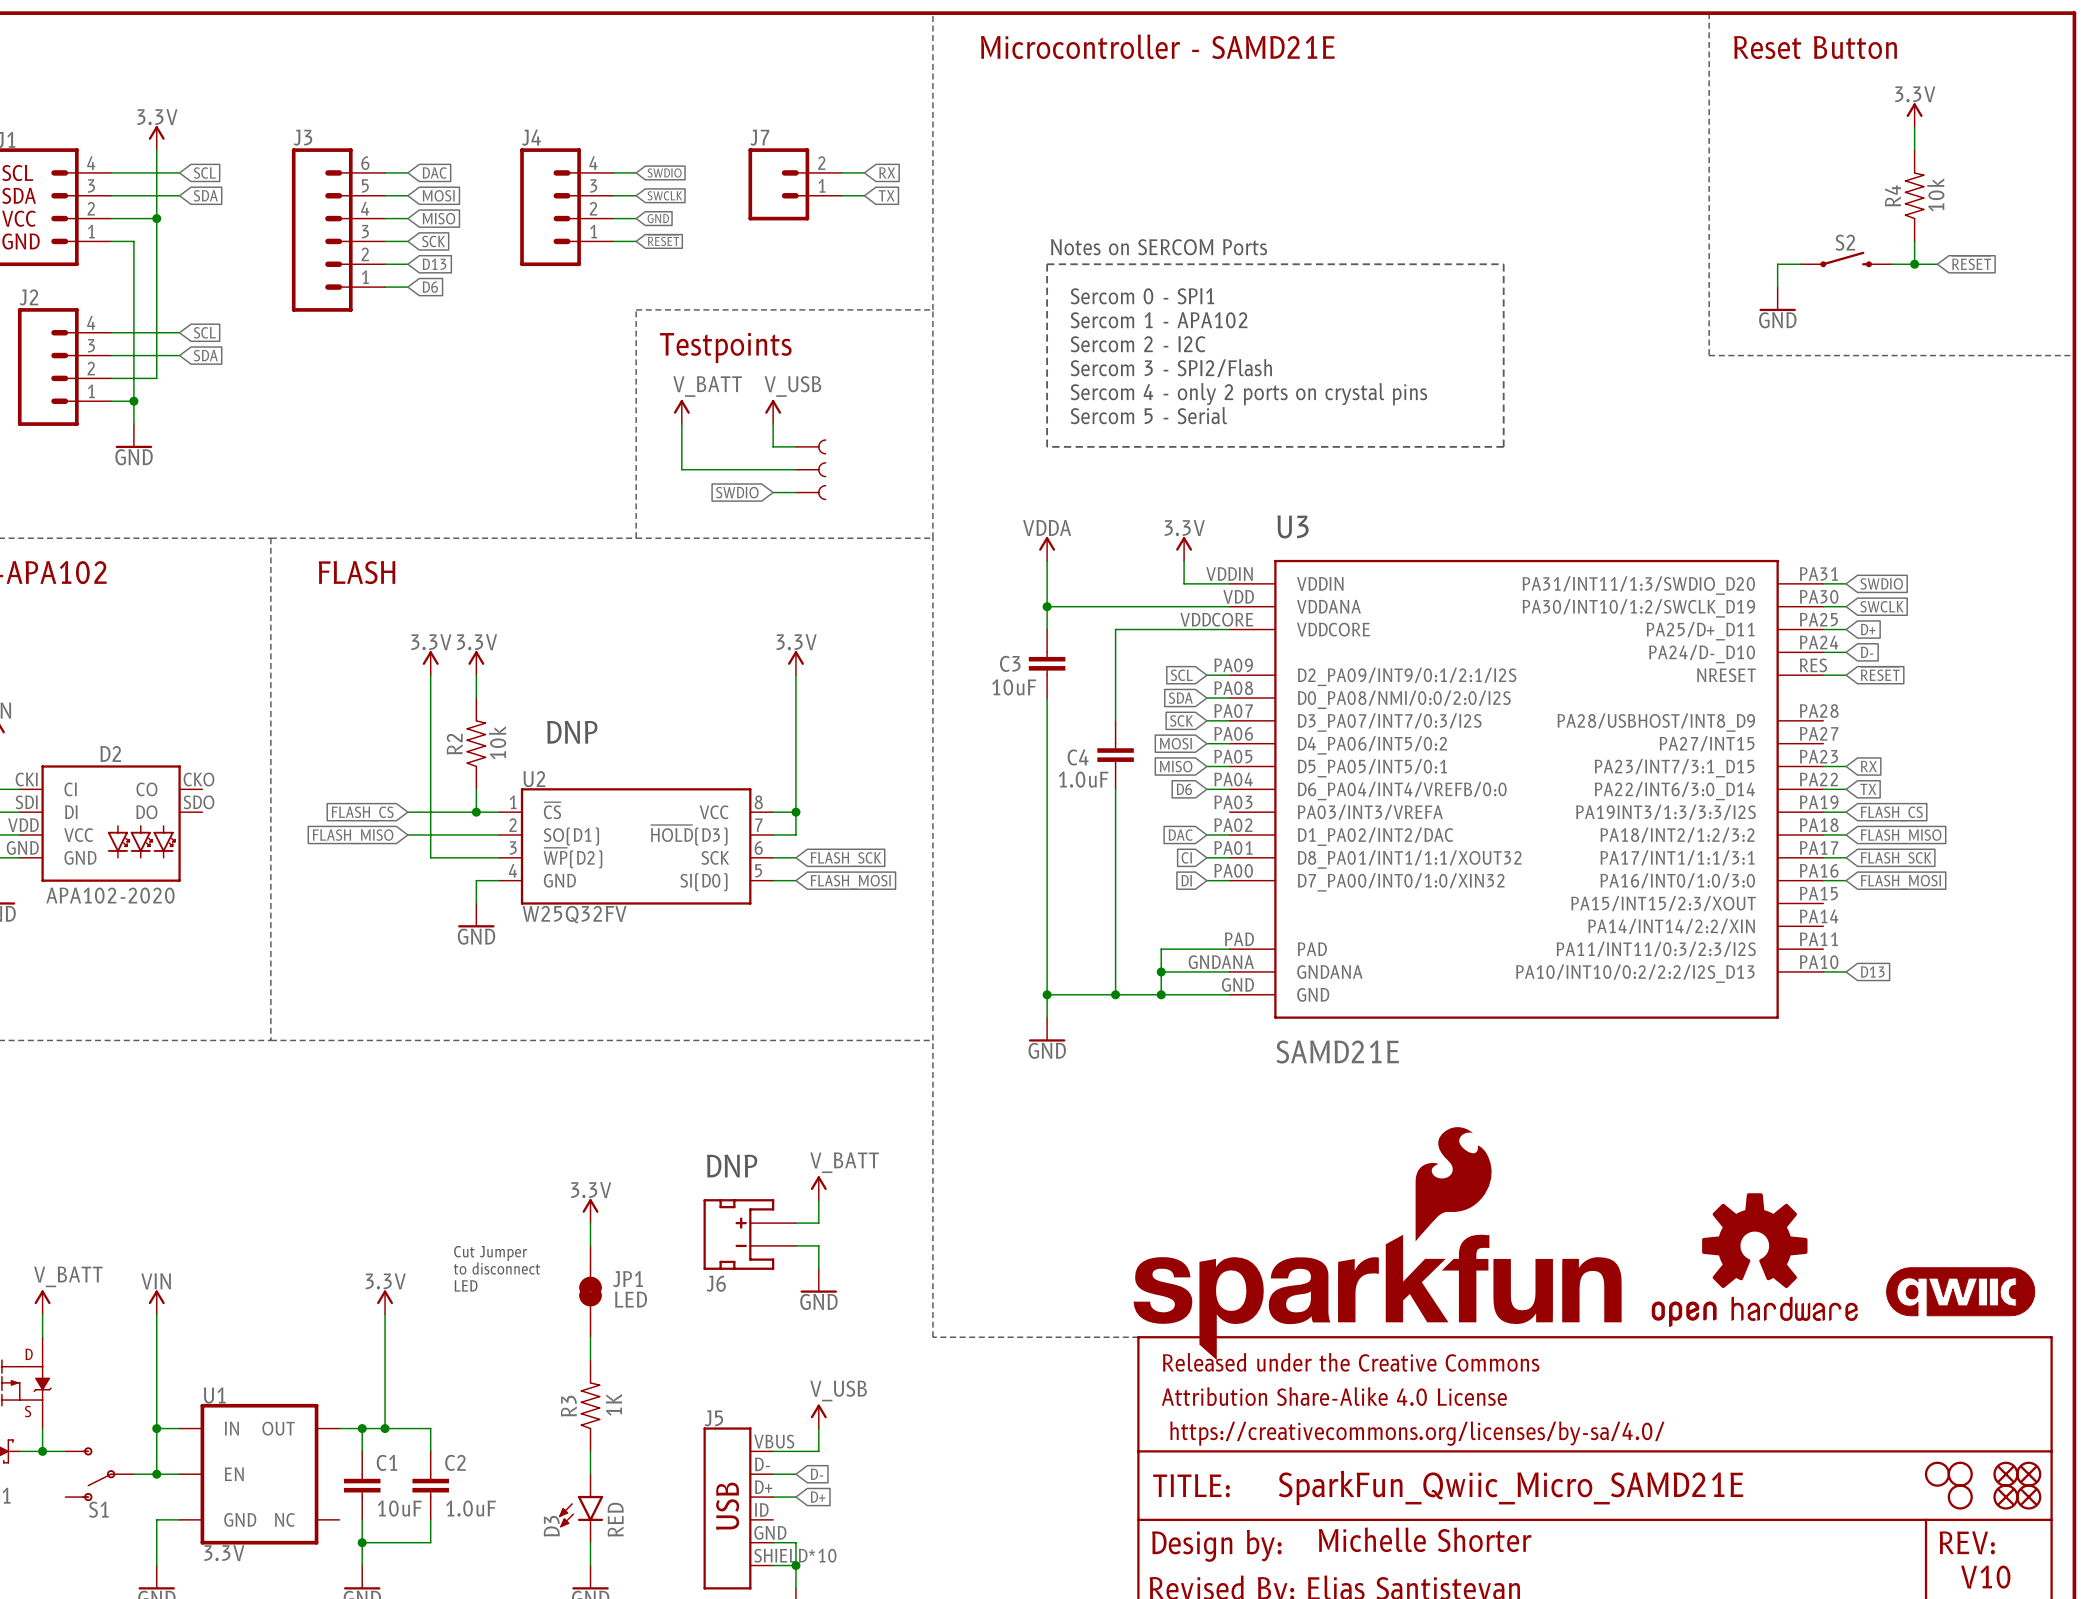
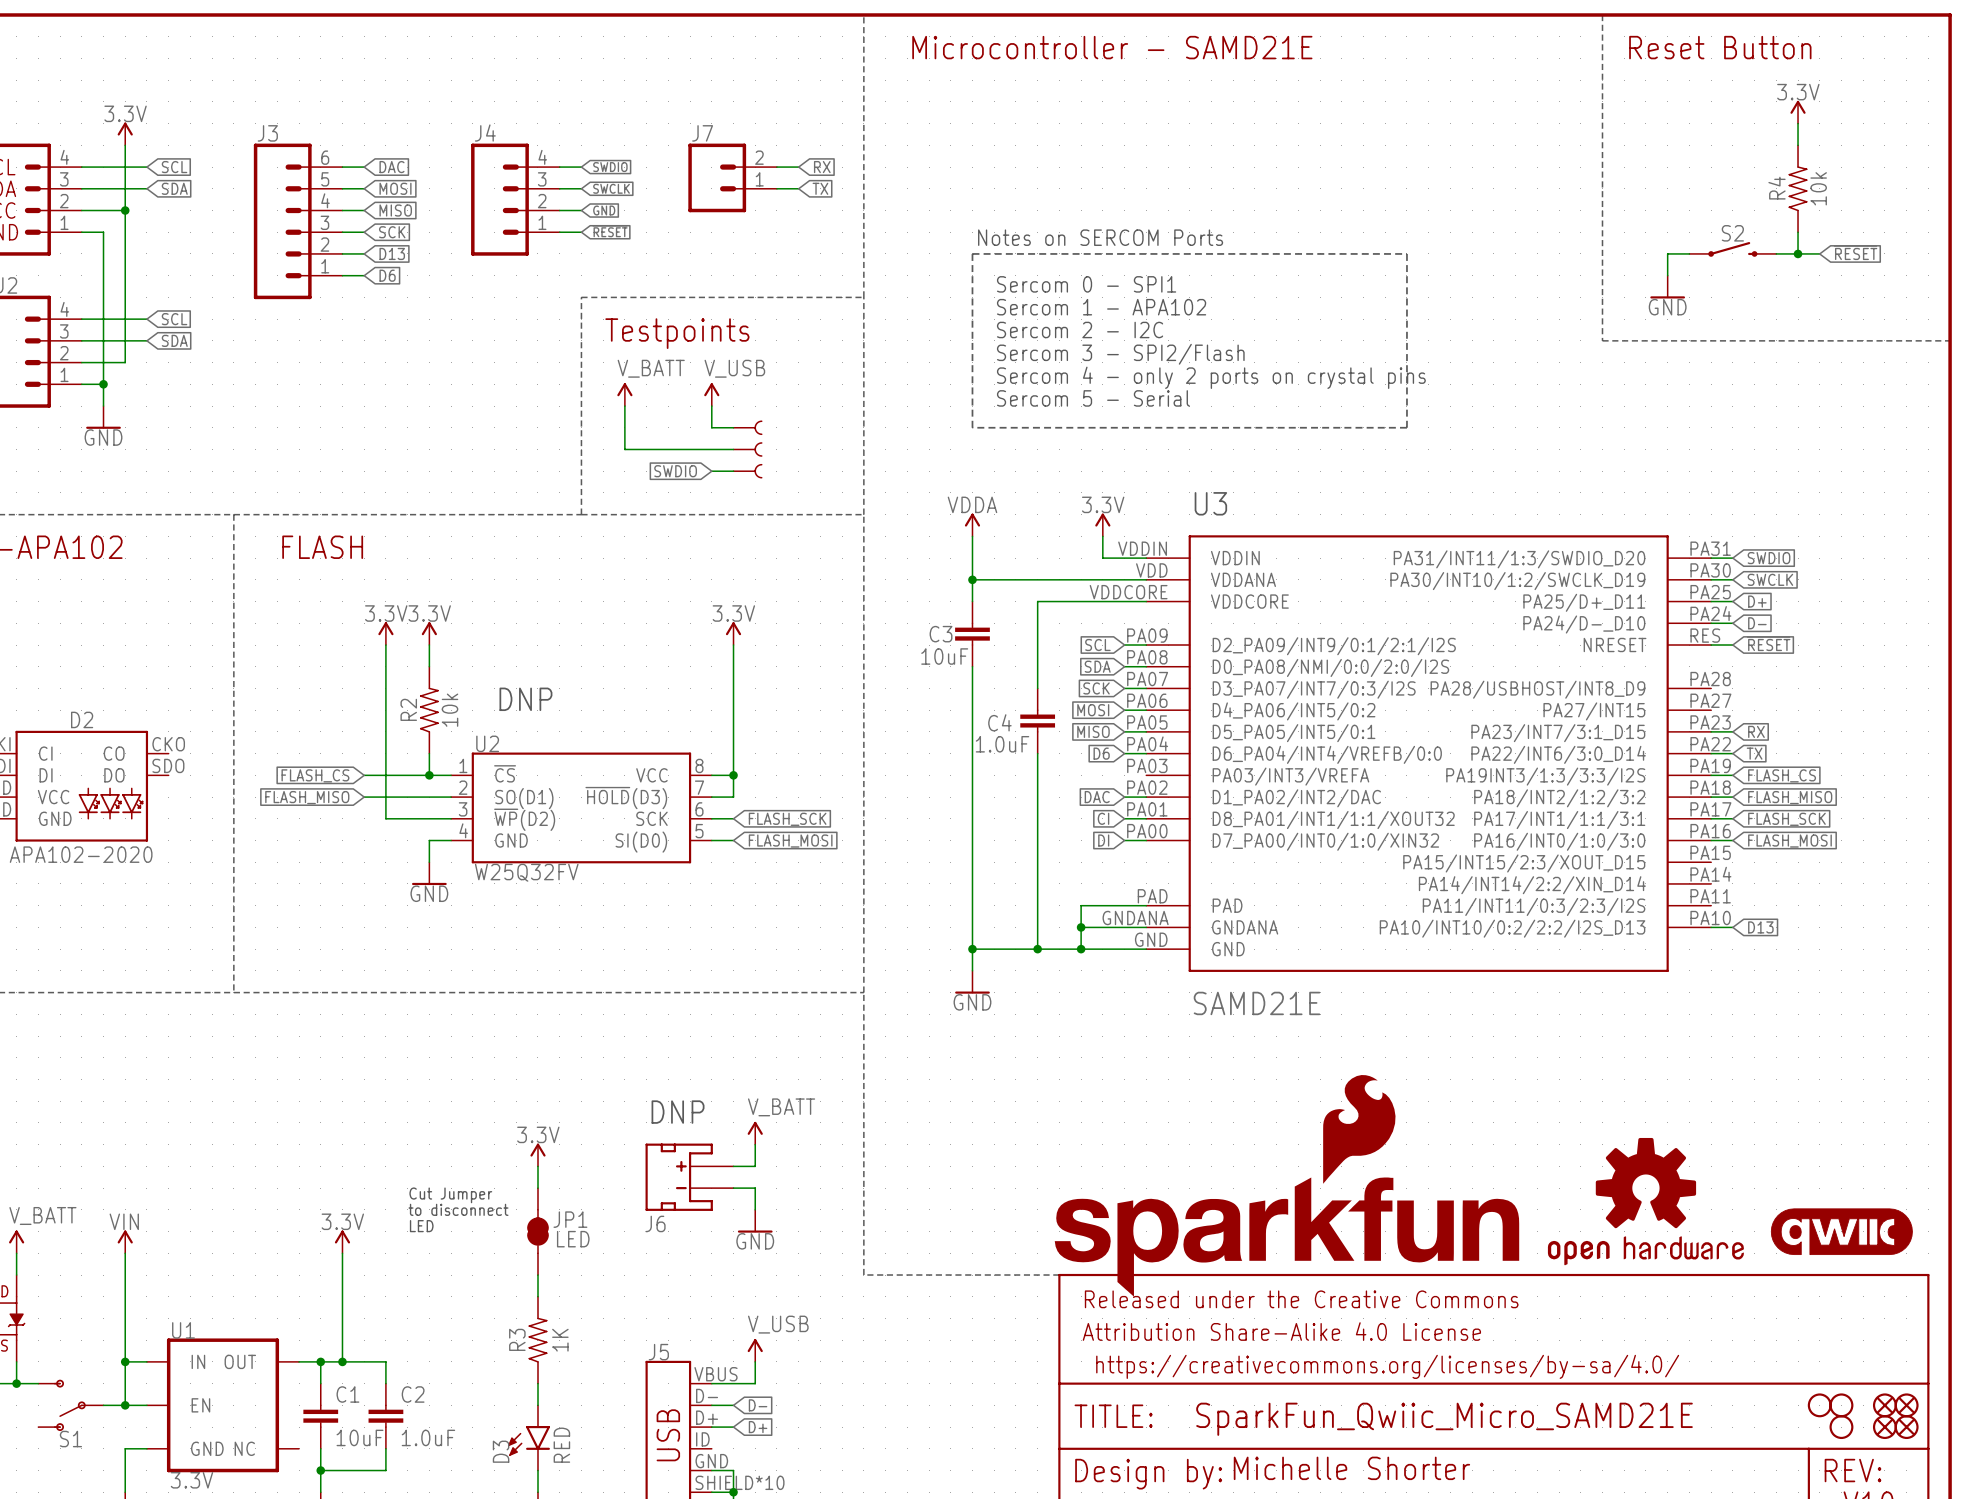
part pin name: PA15/INT15/2:3/XOUT (1663, 903) -> PA15/INT15/2:3/XOUT_D15 (1524, 863)
part pin name: PA14/INT14/2:2/XIN (1671, 926) -> PA14/INT14/2:2/XIN_D14 (1532, 885)

